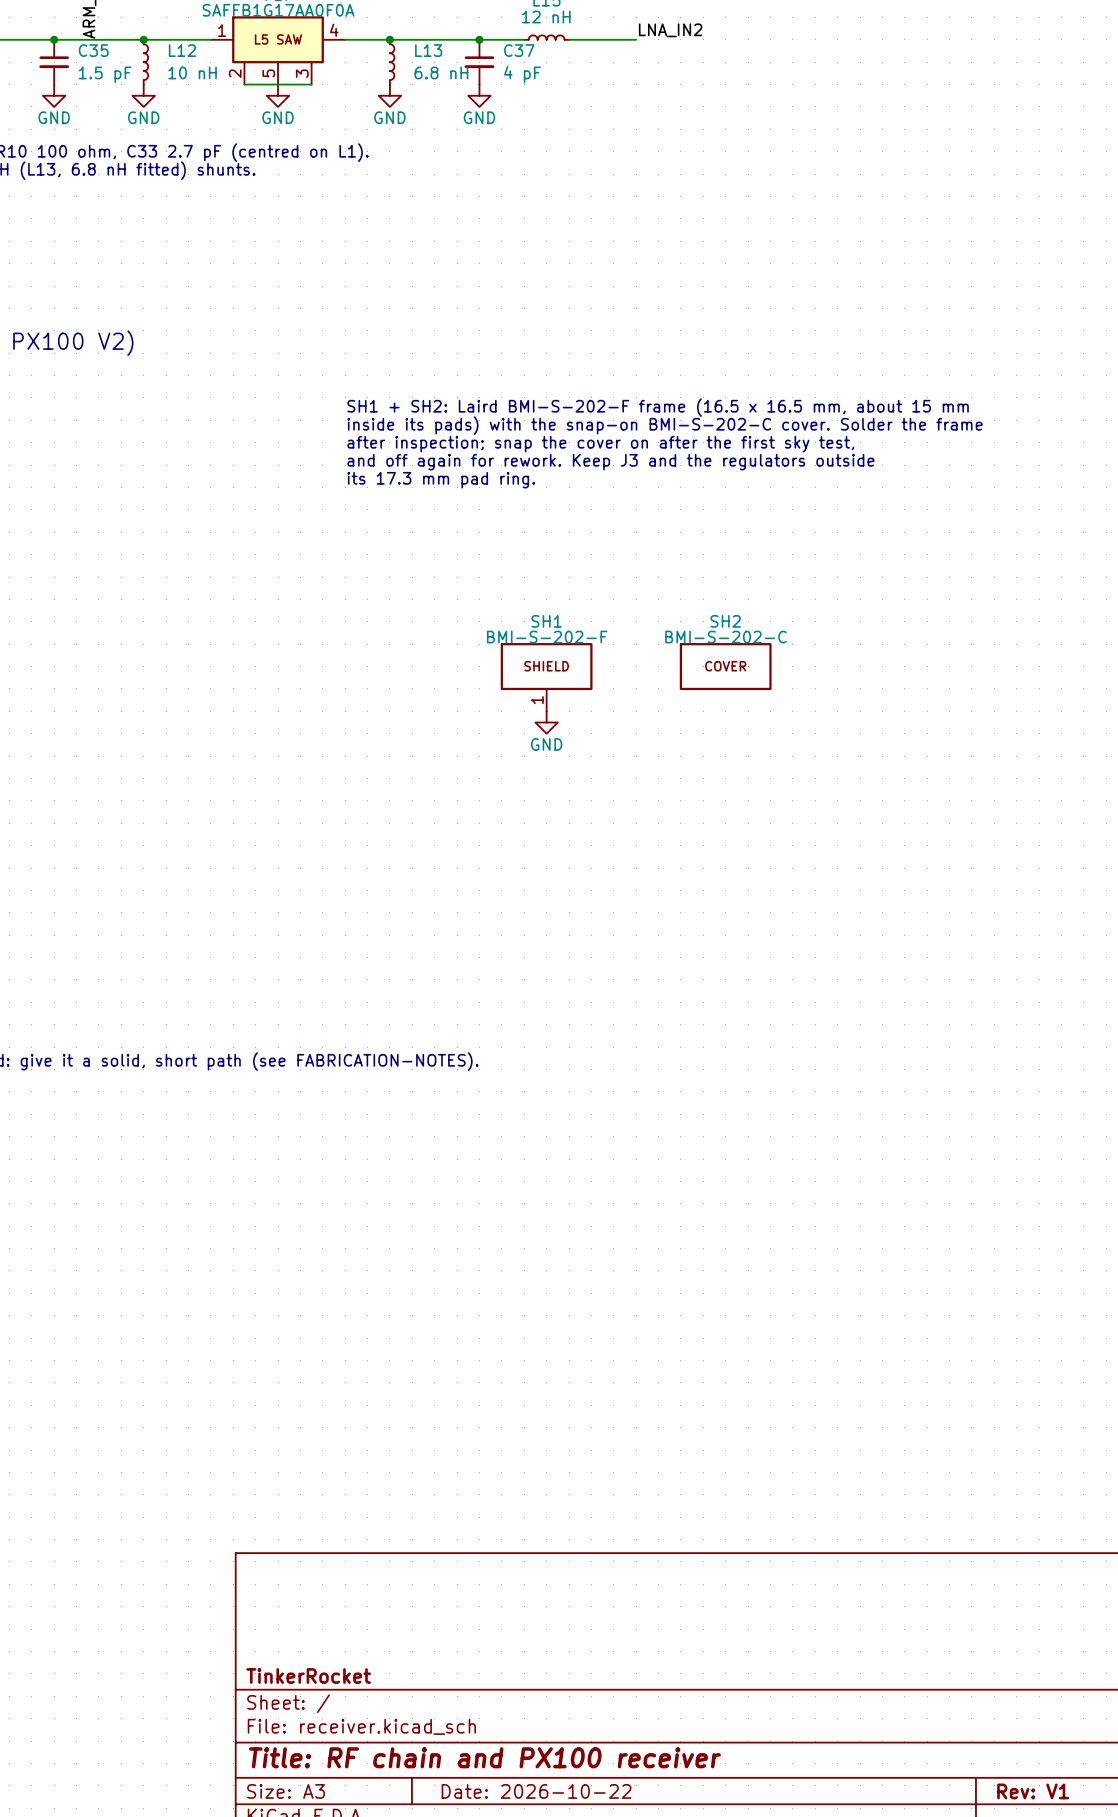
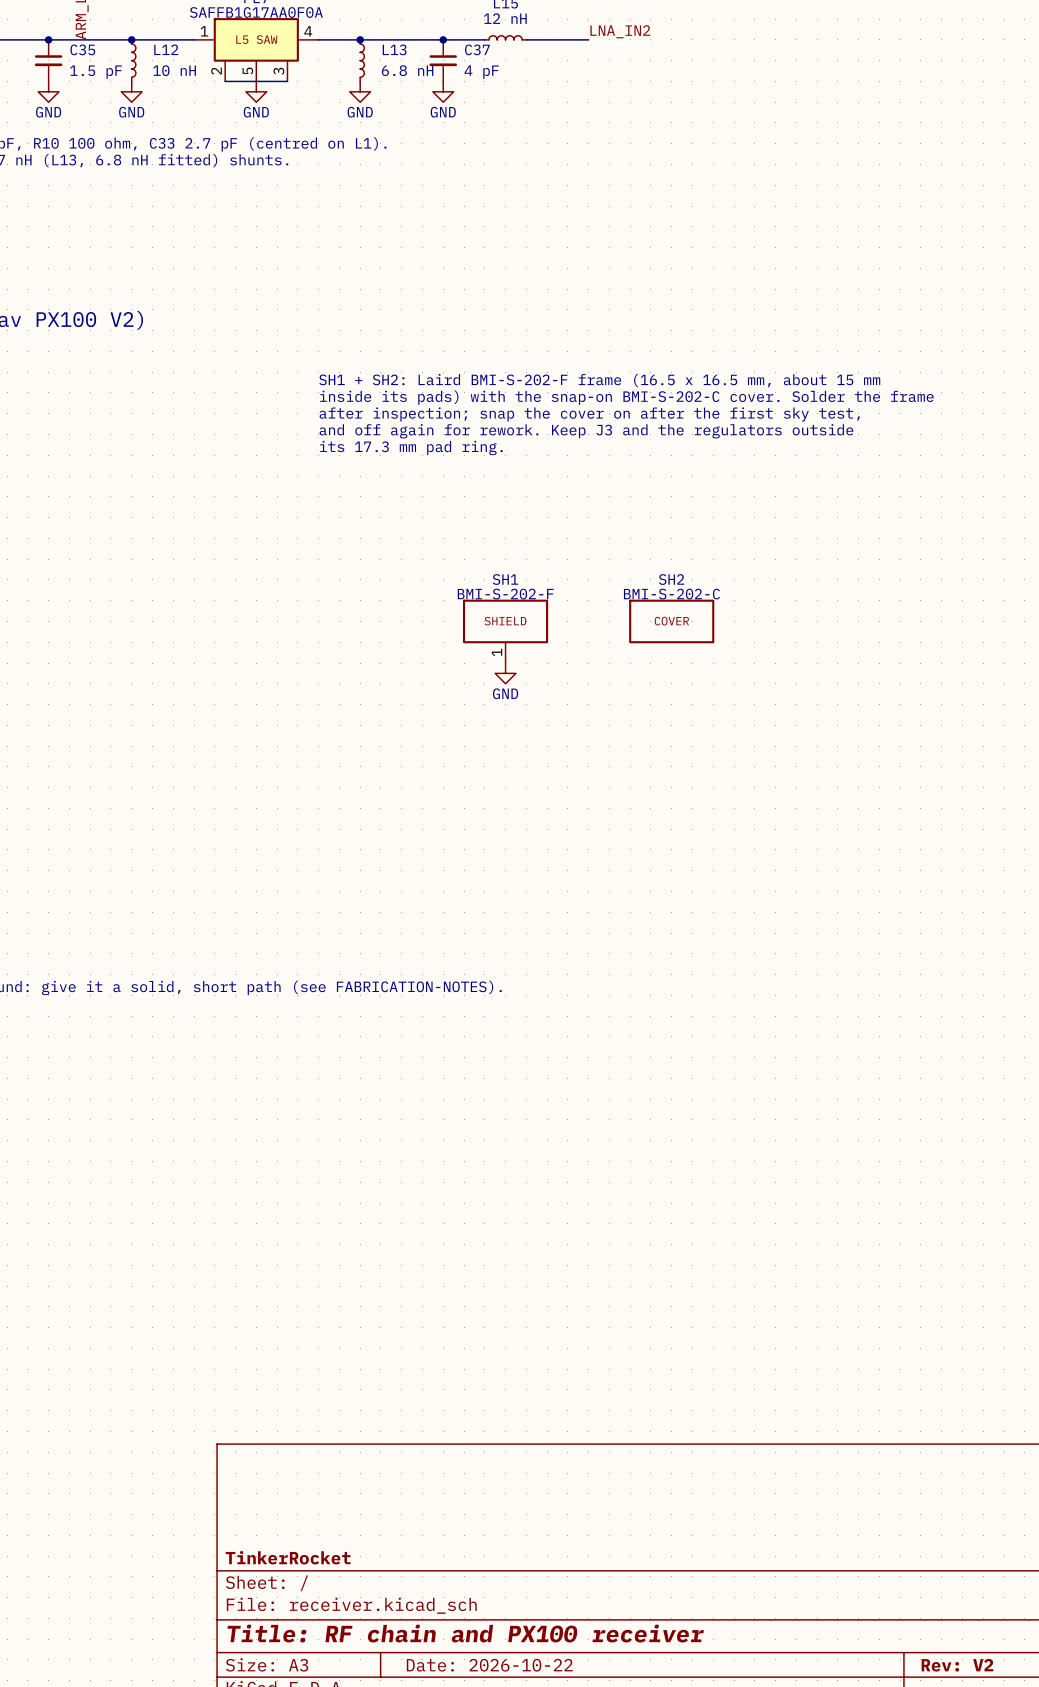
title block: Rev: V1 (1033, 1791) -> Rev: V2 (957, 1665)

